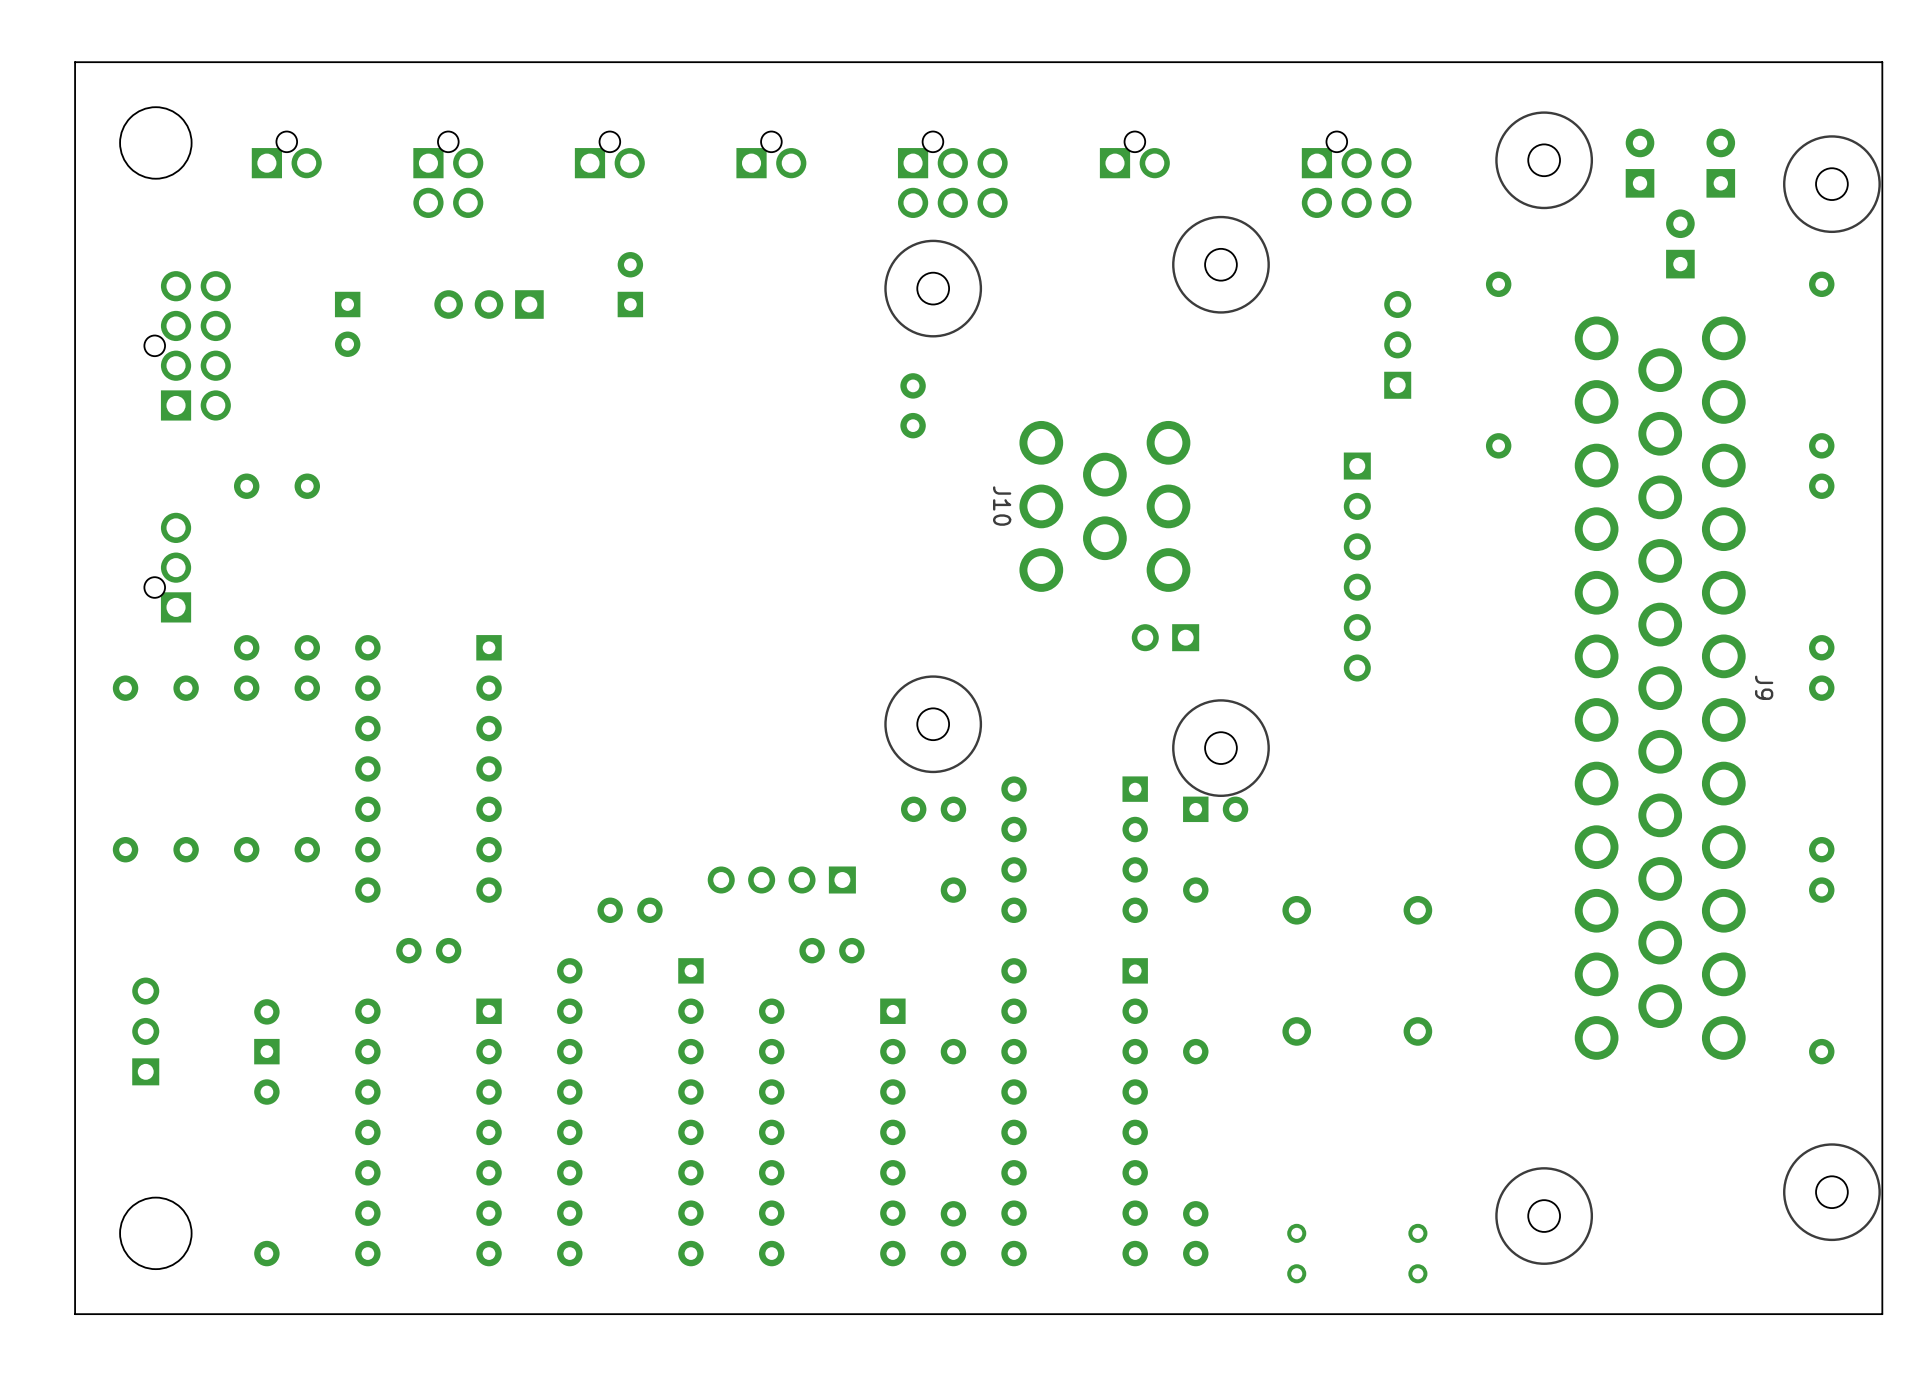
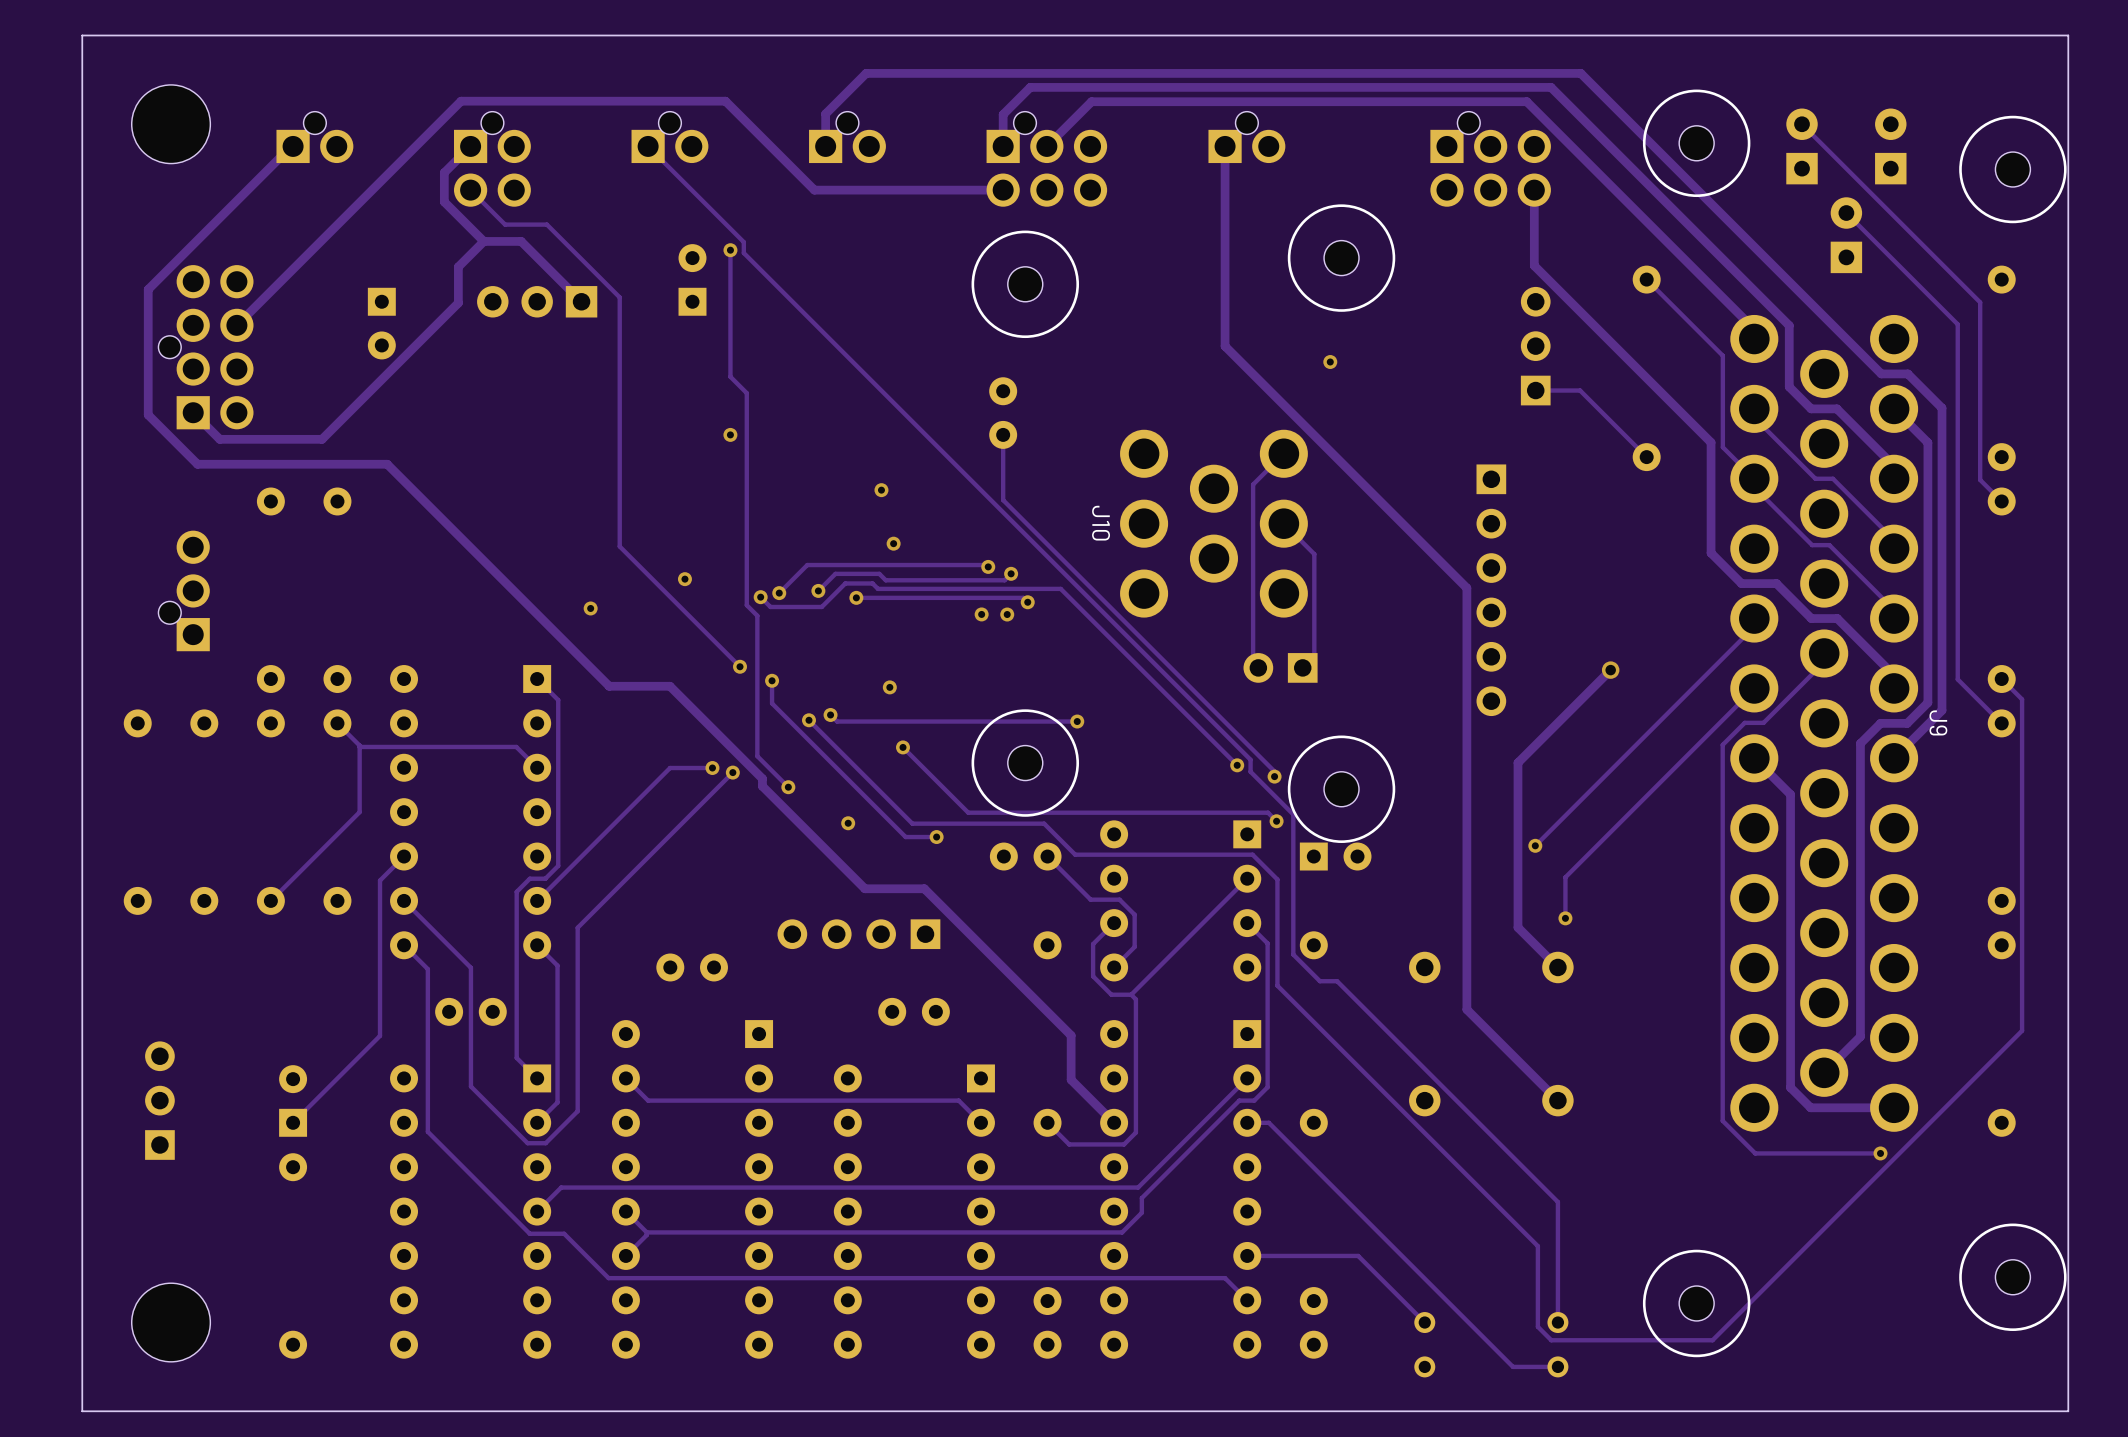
track: none -> (1802, 124) (1980, 302) (1980, 479) (2001, 501)
track: none -> (293, 146) (148, 289) (148, 414) (197, 464) (387, 464) (609, 686) (670, 686) (762, 778) (762, 786) (864, 888) (924, 888) (1071, 1035) (1071, 1079) (1114, 1122)
track: none -> (470, 146) (444, 172) (444, 201) (483, 241)
track: none -> (648, 146) (743, 242) (743, 253) (1250, 759) (1250, 771) (1293, 814) (1293, 954) (1319, 981) (1337, 981) (1557, 1202) (1557, 1322)
track: none -> (825, 146) (825, 113) (866, 73) (1580, 73) (1881, 373) (1907, 373) (1942, 408) (1942, 710) (1894, 758)
track: none -> (1003, 146) (1003, 114) (1030, 87) (1551, 87) (1789, 325) (1789, 386) (1811, 408) (1836, 408) (1894, 466) (1894, 478)
track: none -> (1046, 146) (1091, 101) (1526, 101) (1754, 329) (1754, 338)
track: none -> (1225, 146) (1225, 346) (1466, 588) (1466, 1009) (1557, 1100)
track: none -> (470, 190) (505, 224) (546, 224) (619, 297) (619, 546) (740, 666)
track: none -> (1003, 190) (814, 190) (725, 101) (461, 101) (236, 325)
track: none -> (1534, 190) (1534, 265) (1711, 442) (1711, 553) (1741, 583) (1776, 583) (1811, 618) (1837, 618) (1894, 675) (1894, 688)
track: none -> (1846, 213) (1957, 324) (1957, 679) (2001, 723)
track: none -> (483, 241) (458, 266) (458, 303) (322, 439) (219, 439) (193, 412)
track: none -> (483, 241) (521, 241) (581, 301)
track: none -> (730, 250) (730, 376) (746, 393) (746, 605) (757, 615) (757, 756) (788, 787)
via: none -> (730, 250)
track: none -> (1646, 279) (1722, 355) (1722, 447) (1754, 478) (1754, 487) (1812, 545) (1829, 545) (1894, 609) (1894, 618)
via: none -> (1330, 362)
track: none -> (1535, 390) (1580, 390) (1646, 457)
track: none -> (1754, 408) (1754, 417) (1815, 478) (1832, 478) (1894, 539) (1894, 548)
track: none -> (1894, 408) (1927, 442) (1927, 702) (1907, 723) (1880, 723) (1860, 743) (1860, 1036) (1824, 1072)
via: none -> (730, 434)
track: none -> (1003, 434) (1003, 500) (1274, 771) (1274, 776)
track: none -> (1283, 453) (1253, 484) (1253, 662) (1258, 667)
via: none -> (881, 490)
track: none -> (1283, 523) (1314, 554) (1314, 656) (1302, 667)
via: none -> (893, 543)
track: none -> (988, 566) (986, 565) (807, 565) (779, 593)
via: none -> (988, 566)
track: none -> (1011, 573) (1004, 580) (885, 580) (879, 573) (835, 573) (818, 590)
via: none -> (1011, 573)
via: none -> (684, 579)
via: none -> (818, 590)
via: none -> (779, 593)
track: none -> (760, 597) (770, 606) (821, 606) (845, 583) (872, 583) (877, 588) (1060, 588) (1237, 765)
via: none -> (760, 597)
track: none -> (856, 597) (1023, 597) (1027, 602)
via: none -> (856, 597)
via: none -> (1027, 602)
via: none -> (590, 608)
via: none -> (981, 614)
via: none -> (1007, 614)
track: none -> (1754, 618) (1754, 626) (1535, 845)
track: none -> (1824, 653) (1824, 662) (1763, 722) (1744, 722) (1722, 744) (1722, 1120) (1755, 1153) (1880, 1153)
via: none -> (740, 666)
track: none -> (1610, 670) (1517, 762) (1517, 927) (1557, 967)
via: none -> (1610, 670)
track: none -> (537, 679) (558, 700) (558, 865) (545, 878) (529, 878) (516, 891) (516, 1057) (537, 1078)
track: none -> (2001, 679) (2022, 699) (2022, 1030) (1712, 1340) (1551, 1340) (1537, 1326) (1537, 1246) (1277, 985) (1277, 879) (1252, 854) (1075, 854) (1044, 823) (912, 823) (808, 720)
track: none -> (772, 680) (772, 703) (905, 837) (936, 837)
via: none -> (772, 680)
via: none -> (889, 687)
track: none -> (1754, 688) (1565, 877) (1565, 918)
track: none -> (830, 714) (837, 721) (1077, 721)
via: none -> (830, 714)
via: none -> (808, 720)
via: none -> (1077, 721)
track: none -> (337, 723) (359, 745) (359, 812) (270, 900)
track: none -> (359, 746) (516, 746) (537, 767)
track: none -> (903, 747) (968, 812) (1268, 812) (1276, 821)
via: none -> (903, 747)
track: none -> (1754, 758) (1790, 794) (1790, 1087) (1810, 1107) (1894, 1107)
via: none -> (1237, 765)
track: none -> (712, 768) (670, 768) (537, 900)
via: none -> (712, 768)
track: none -> (732, 772) (577, 927) (577, 1111) (545, 1143) (527, 1143) (470, 1086) (470, 967) (404, 900)
via: none -> (732, 772)
via: none -> (1274, 776)
via: none -> (788, 787)
via: none -> (1276, 821)
via: none -> (848, 823)
via: none -> (936, 837)
via: none -> (1535, 845)
track: none -> (404, 856) (380, 880) (380, 1035) (293, 1122)
track: none -> (1047, 856) (1090, 899) (1119, 899) (1134, 914) (1134, 946) (1114, 967)
track: none -> (1247, 878) (1131, 994)
via: none -> (1565, 918)
track: none -> (1114, 923) (1093, 944) (1093, 976) (1111, 994) (1131, 994)
track: none -> (1247, 923) (1267, 943) (1267, 1087) (1254, 1100) (1239, 1100) (1141, 1198) (1141, 1212) (1122, 1232) (646, 1232)
track: none -> (404, 945) (427, 969) (427, 1131) (529, 1233) (564, 1233) (608, 1278) (1225, 1278) (1247, 1300)
track: none -> (537, 945) (557, 965) (557, 1102) (537, 1122)
track: none -> (1131, 994) (1135, 999) (1135, 1132) (1124, 1144) (1069, 1144) (1047, 1122)
track: none -> (625, 1078) (648, 1100) (958, 1100) (980, 1122)
track: none -> (1247, 1078) (1138, 1187) (561, 1187) (537, 1211)
track: none -> (1247, 1122) (1268, 1122) (1512, 1366) (1557, 1366)
via: none -> (1880, 1153)
track: none -> (625, 1211) (646, 1232)
track: none -> (646, 1232) (646, 1235) (625, 1255)
track: none -> (1247, 1255) (1358, 1255) (1424, 1322)

